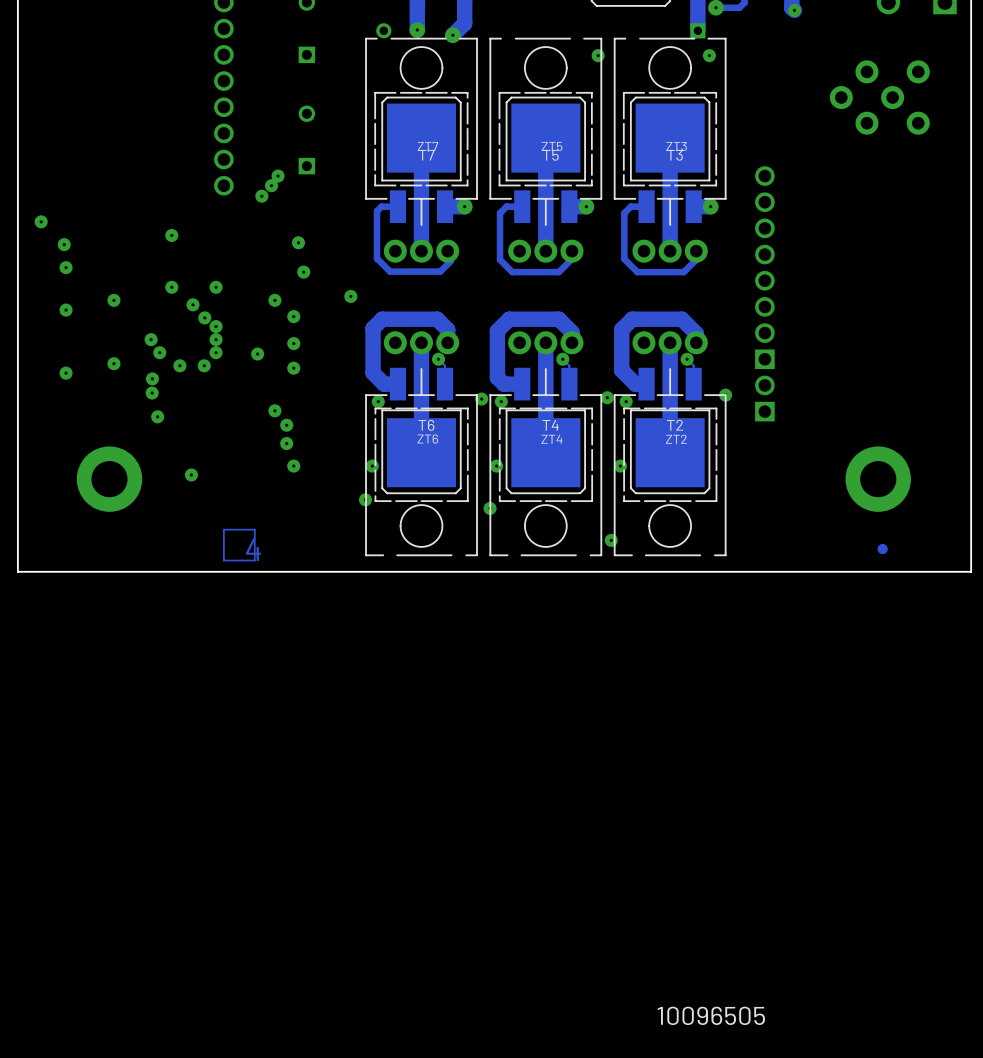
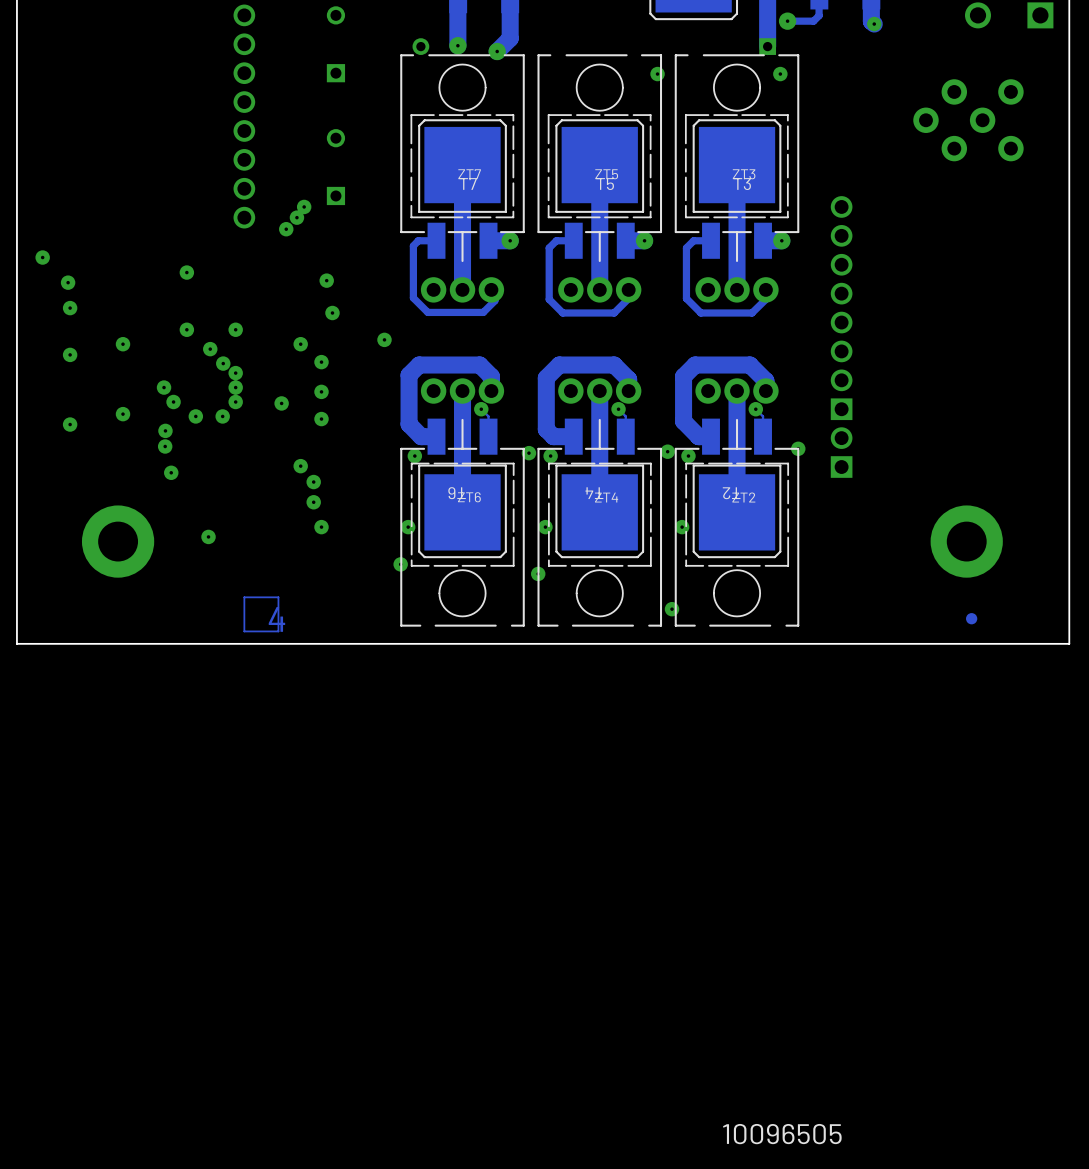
T6 name rotation: 0° (426, 425) -> 180° (457, 493)
T4 name rotation: 0° (550, 425) -> 180° (594, 493)
T2 name rotation: 0° (675, 425) -> 180° (731, 493)

